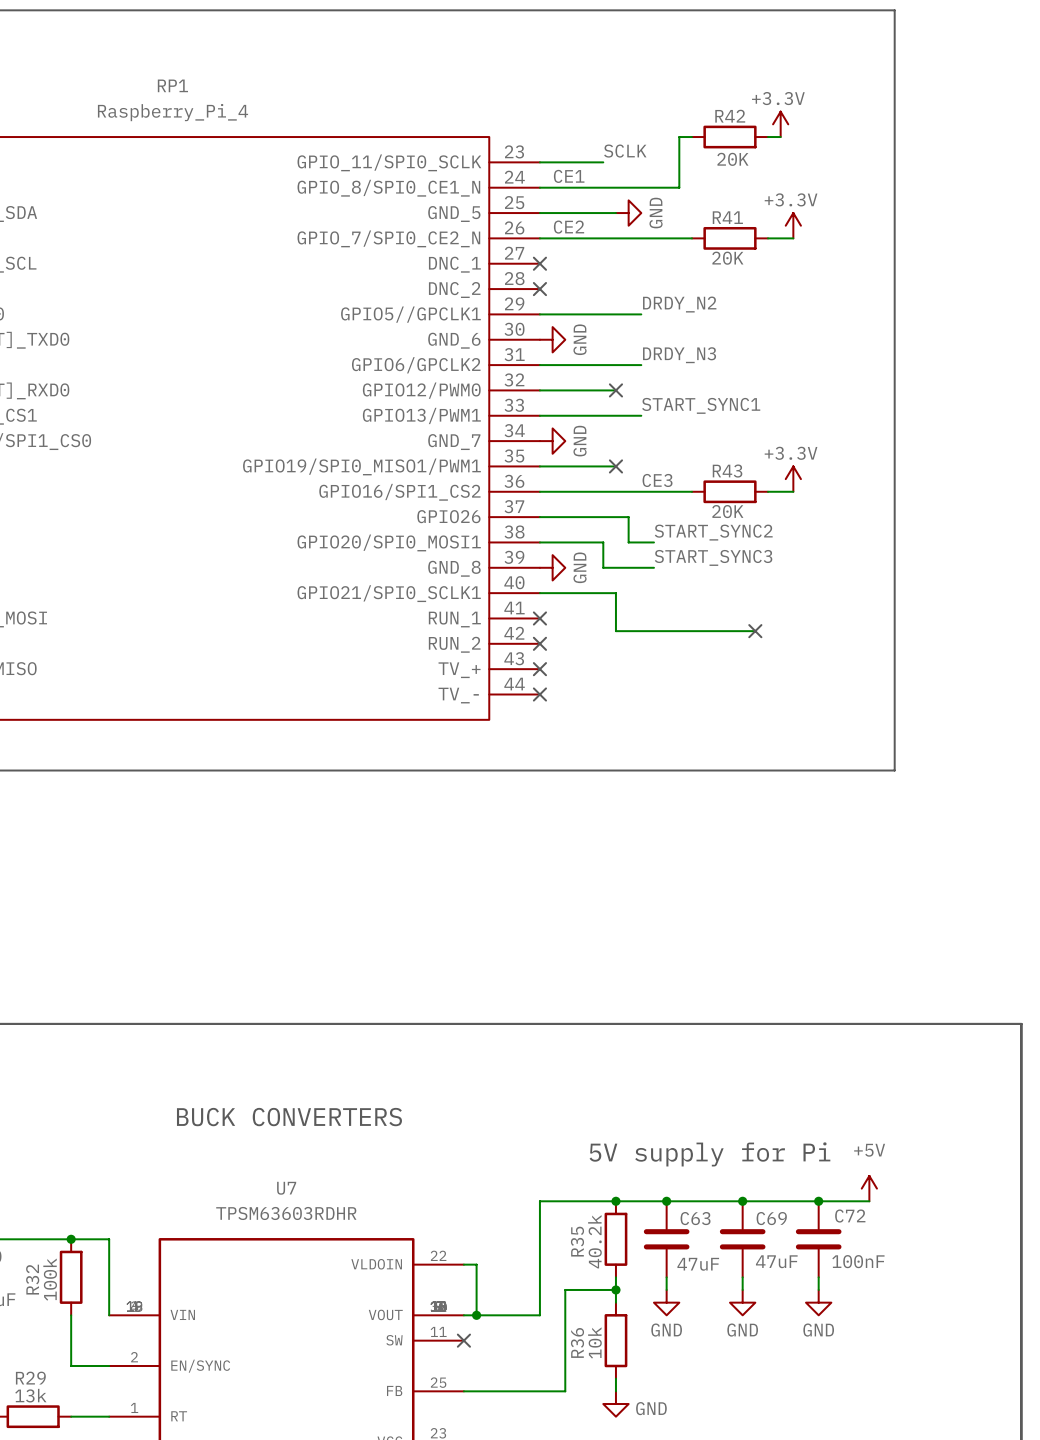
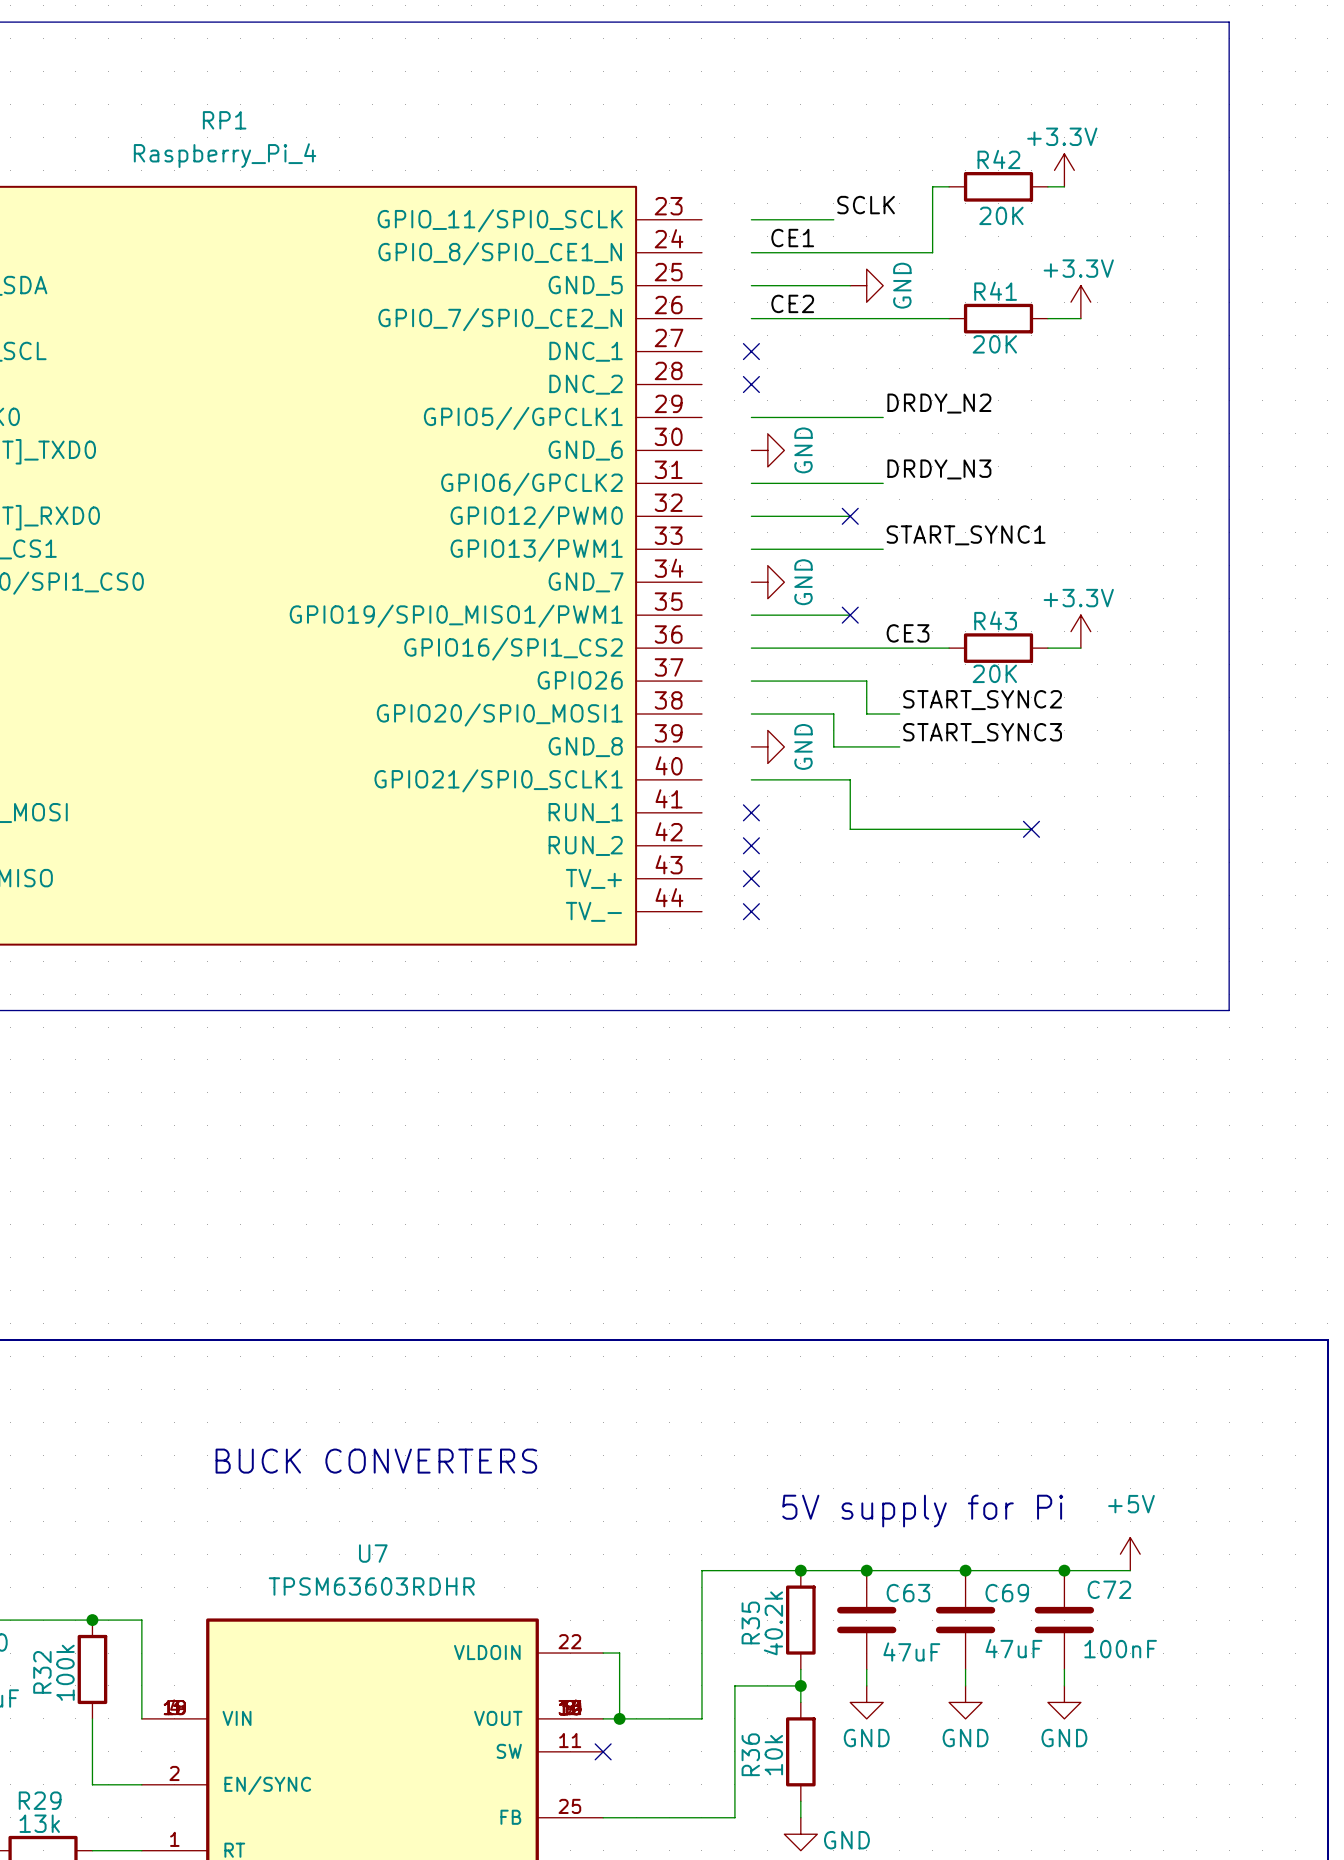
line: (894, 10) (894, 770) -> (1163, 22) (1229, 22) (1229, 1010) (1163, 1010)
power symbol position: +3.3V (780, 124) -> +3.3V (1064, 170)
wire: (691, 137) (679, 137) (679, 187) -> (949, 186) (932, 186) (932, 252) (883, 252)
R42 position: (729, 137) -> (998, 186)
wire: (768, 137) (780, 137) -> (1047, 186) (1064, 186)
label position: SCLK (625, 151) -> SCLK (866, 205)
wire: (539, 162) (577, 162) -> (784, 219) (833, 219)
label position: CE1 (569, 176) -> CE1 (792, 238)
wire: (539, 187) (577, 187) -> none
wire: (539, 213) (577, 213) -> (800, 285) (850, 285)
power symbol position: GND (628, 213) -> GND (866, 285)
power symbol position: +3.3V (793, 225) -> +3.3V (1080, 302)
label position: CE2 (569, 227) -> CE2 (792, 303)
wire: (539, 238) (577, 238) -> (899, 318) (949, 318)
R41 position: (729, 238) -> (998, 318)
wire: (768, 238) (793, 238) -> (1047, 318) (1080, 318)
no-connect mark: (539, 263) -> none
no-connect mark: none -> (751, 351)
no-connect mark: (539, 289) -> none
no-connect mark: none -> (751, 384)
label position: DRDY_N2 (679, 304) -> DRDY_N2 (939, 403)
wire: (539, 314) (577, 314) -> (833, 417) (883, 417)
power symbol position: GND (552, 339) -> GND (767, 450)
label position: DRDY_N3 (679, 355) -> DRDY_N3 (939, 469)
wire: (539, 365) (577, 365) -> (833, 483) (883, 483)
wire: (539, 390) (577, 390) -> (800, 516) (850, 516)
no-connect mark position: (615, 390) -> (850, 516)
label position: START_SYNC1 (701, 405) -> START_SYNC1 (966, 535)
wire: (539, 415) (577, 415) -> (833, 549) (883, 549)
power symbol position: GND (552, 441) -> GND (767, 582)
wire: (539, 466) (577, 466) -> (800, 615) (850, 615)
no-connect mark position: (615, 466) -> (850, 615)
power symbol position: +3.3V (793, 479) -> +3.3V (1080, 631)
label position: CE3 (657, 480) -> CE3 (908, 633)
wire: (539, 491) (577, 491) -> (899, 648) (949, 648)
R43 position: (729, 491) -> (998, 648)
wire: (768, 491) (793, 491) -> (1047, 648) (1080, 648)
wire: (539, 517) (577, 517) -> none
wire: (628, 517) (628, 542) -> (817, 681) (866, 681) (866, 714) (899, 714)
label position: START_SYNC2 (713, 532) -> START_SYNC2 (982, 700)
wire: (539, 542) (577, 542) -> (982, 829) (1031, 829)
wire: (603, 542) (603, 567) (641, 567) -> (784, 714) (817, 714)
wire: (641, 542) (653, 542) -> (833, 714) (833, 746)
label position: START_SYNC3 (713, 557) -> START_SYNC3 (982, 733)
power symbol position: GND (552, 567) -> GND (767, 746)
wire: (539, 593) (577, 593) -> (850, 746) (899, 746)
wire: (615, 593) (615, 631) (653, 631) -> (800, 779) (850, 779) (850, 829)
no-connect mark: (539, 618) -> none
no-connect mark: none -> (751, 812)
no-connect mark position: (755, 631) -> (1031, 829)
no-connect mark: (539, 643) -> none
no-connect mark: none -> (751, 845)
no-connect mark: (539, 669) -> none
no-connect mark: none -> (751, 878)
no-connect mark: (539, 694) -> none
no-connect mark: none -> (751, 911)

